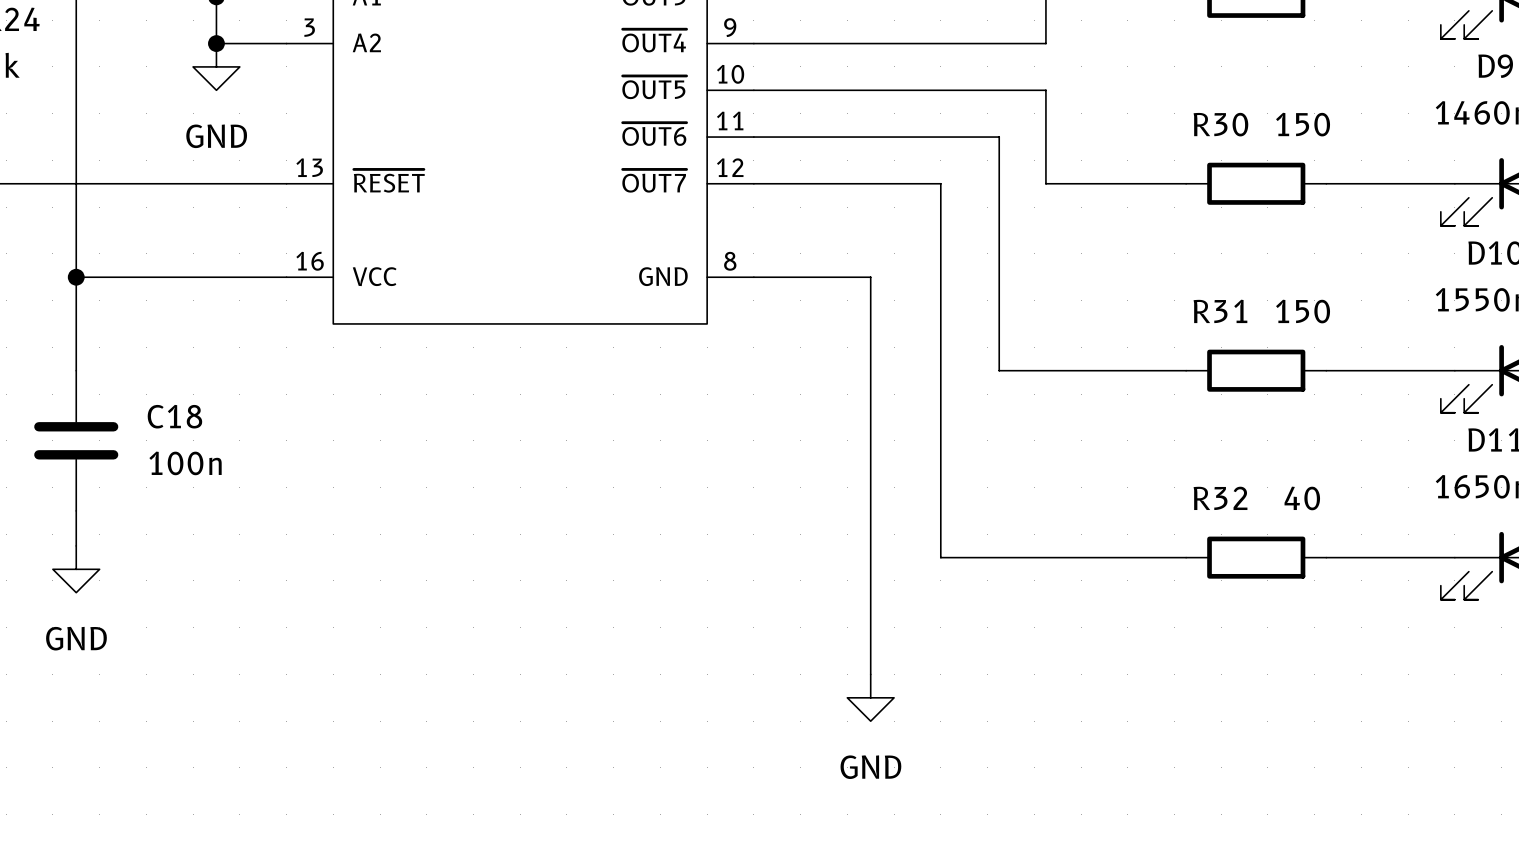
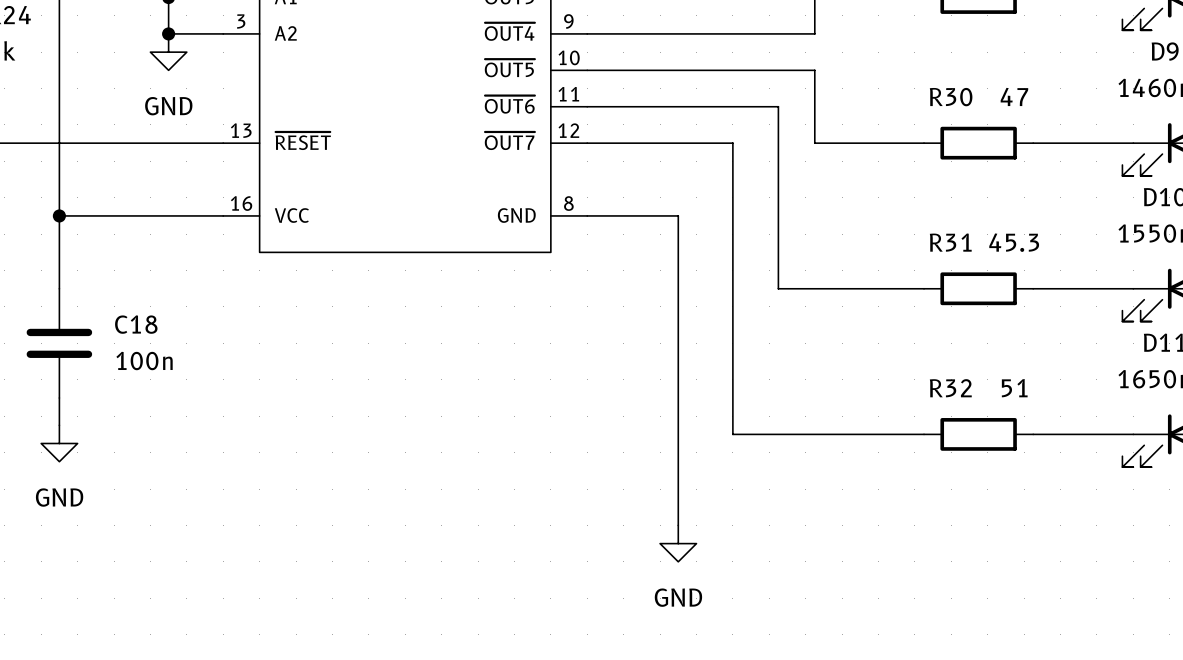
R30 value: 150 (1303, 124) -> 47 (1014, 96)
R31 value: 150 (1303, 311) -> 45.3 (1014, 242)
R32 value: 40 (1302, 498) -> 51 (1014, 388)

